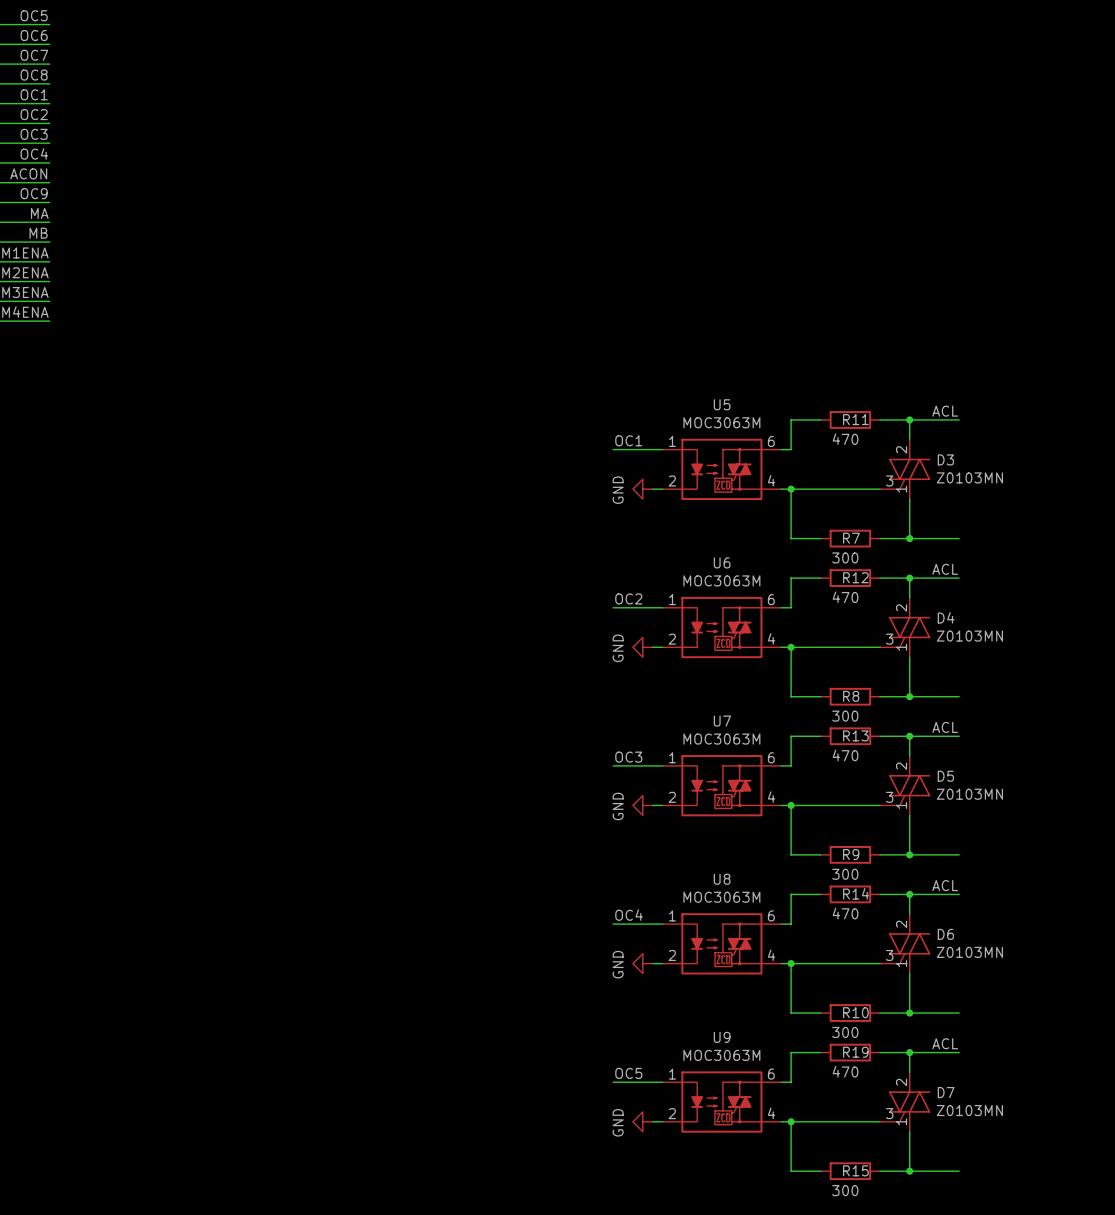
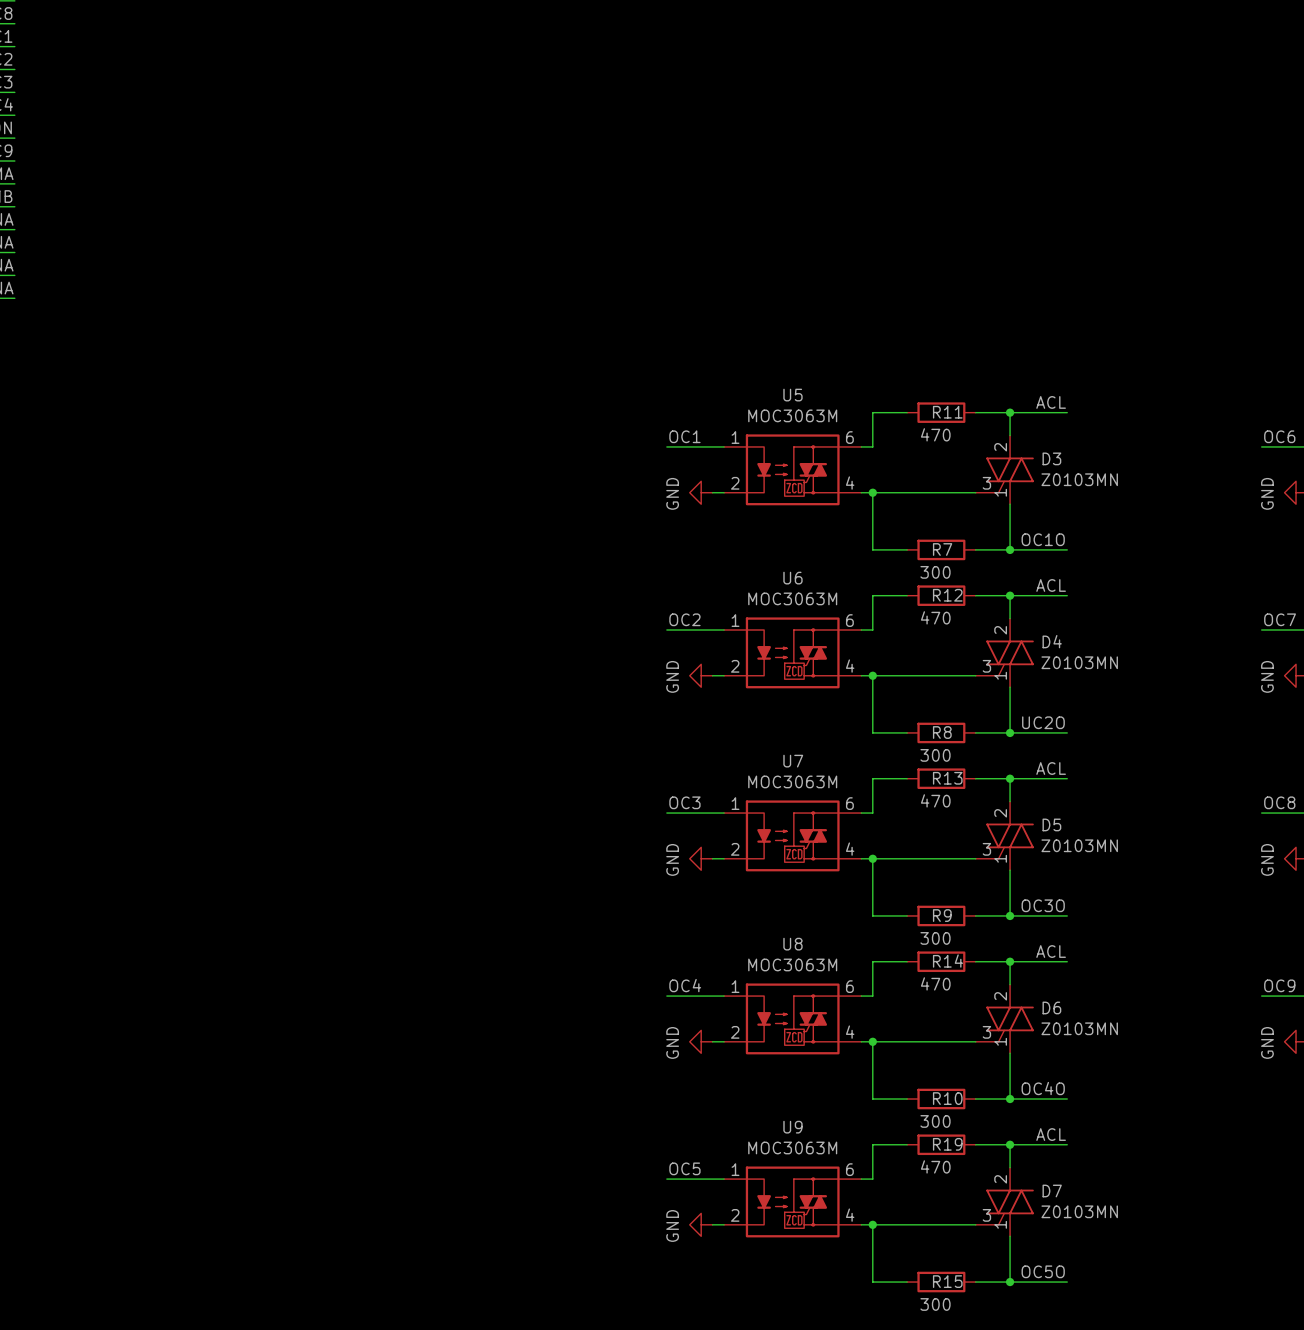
label: none -> OC1O (1043, 539)
label: none -> UC2O (1043, 722)
label: none -> OC3O (1043, 905)
label: none -> OC4O (1043, 1088)
label: none -> OC5O (1043, 1271)

